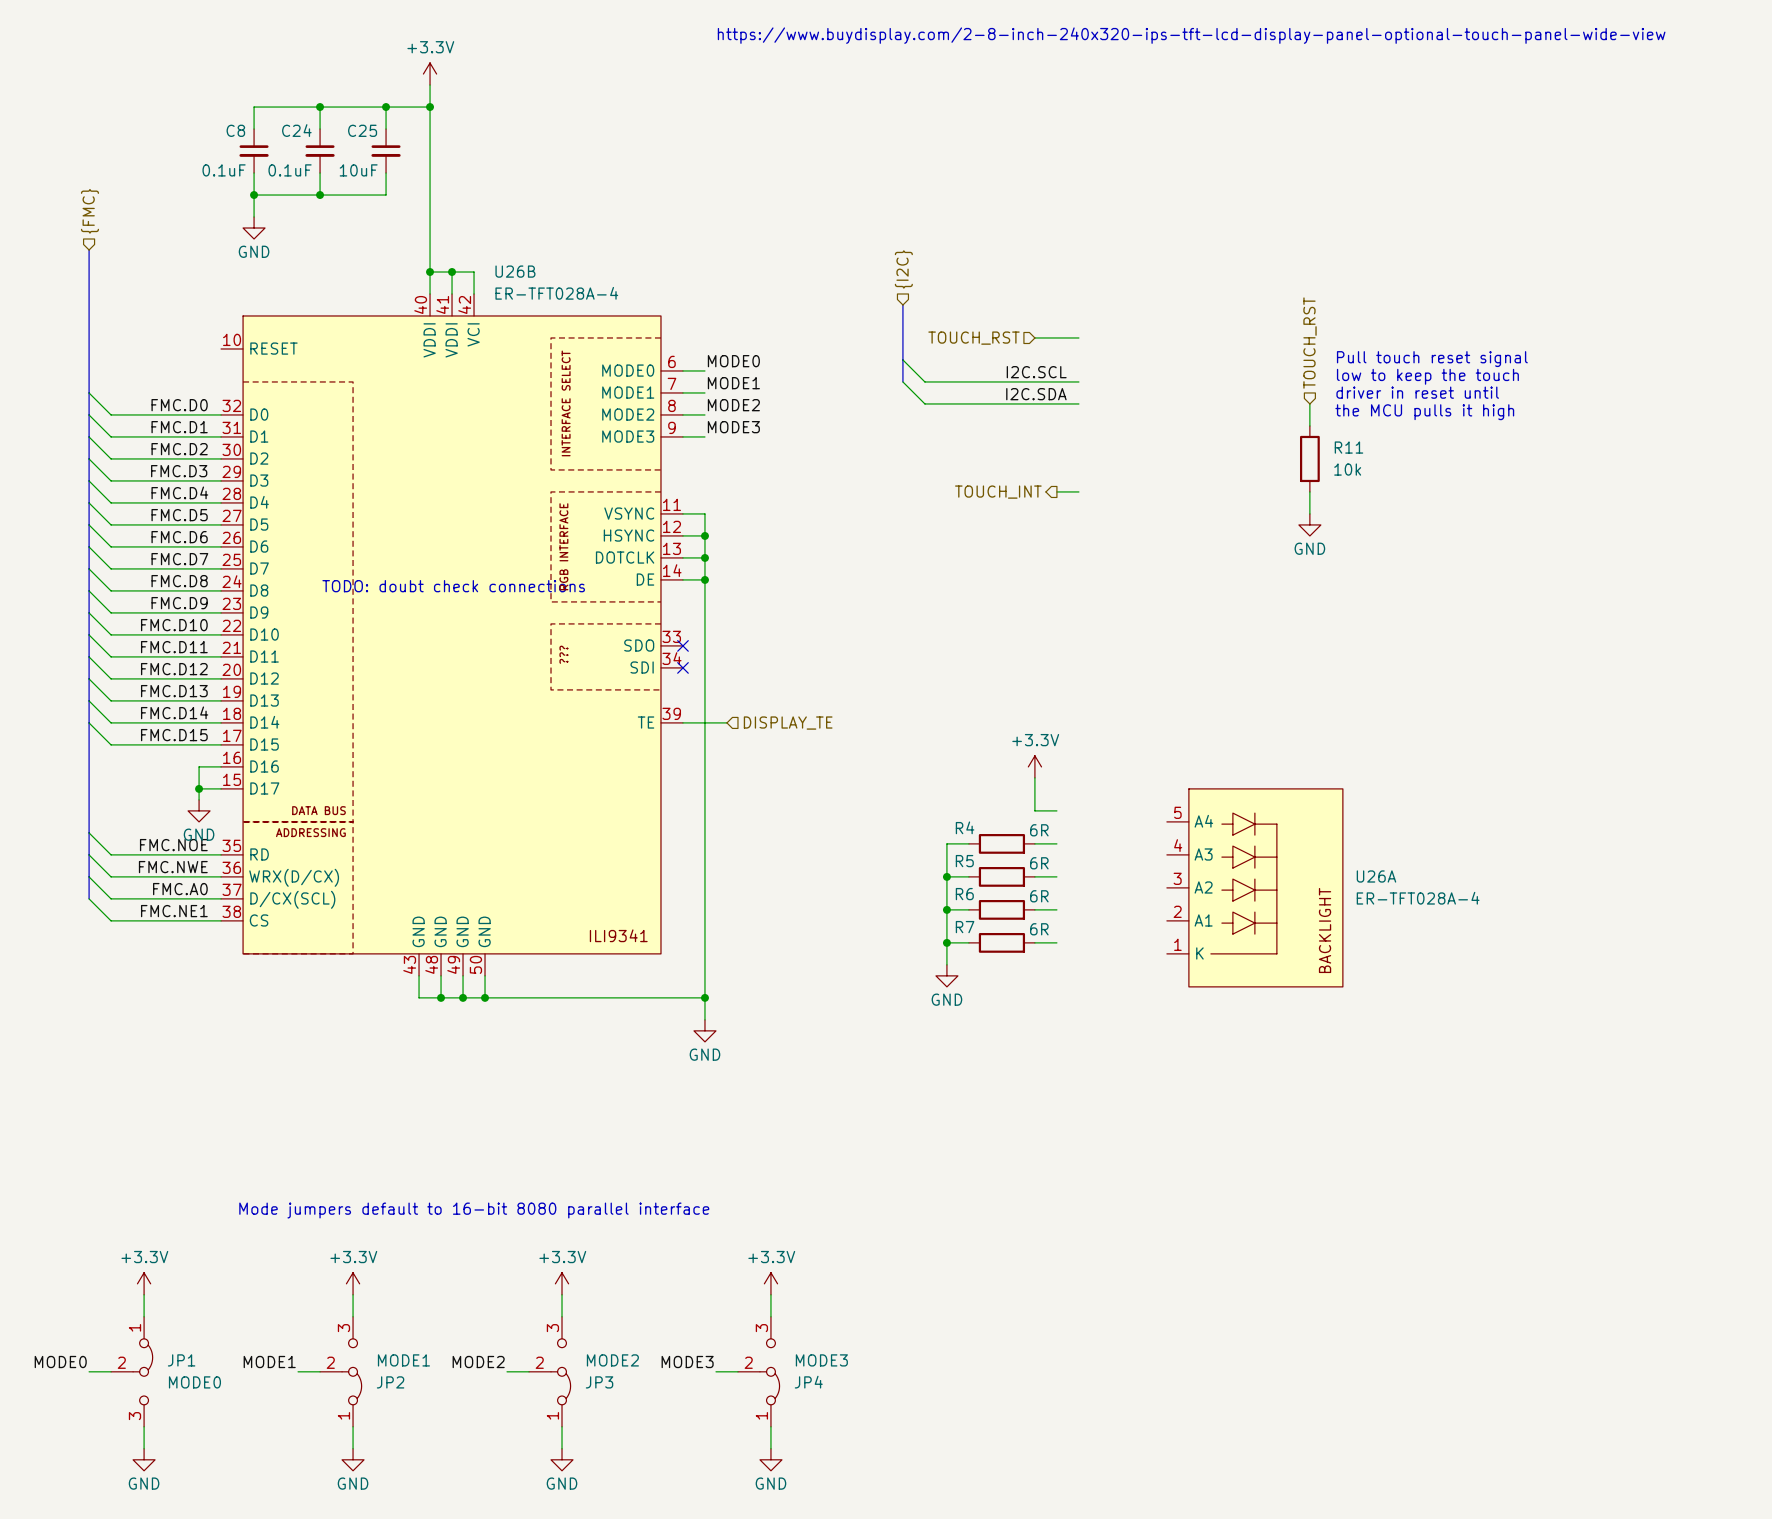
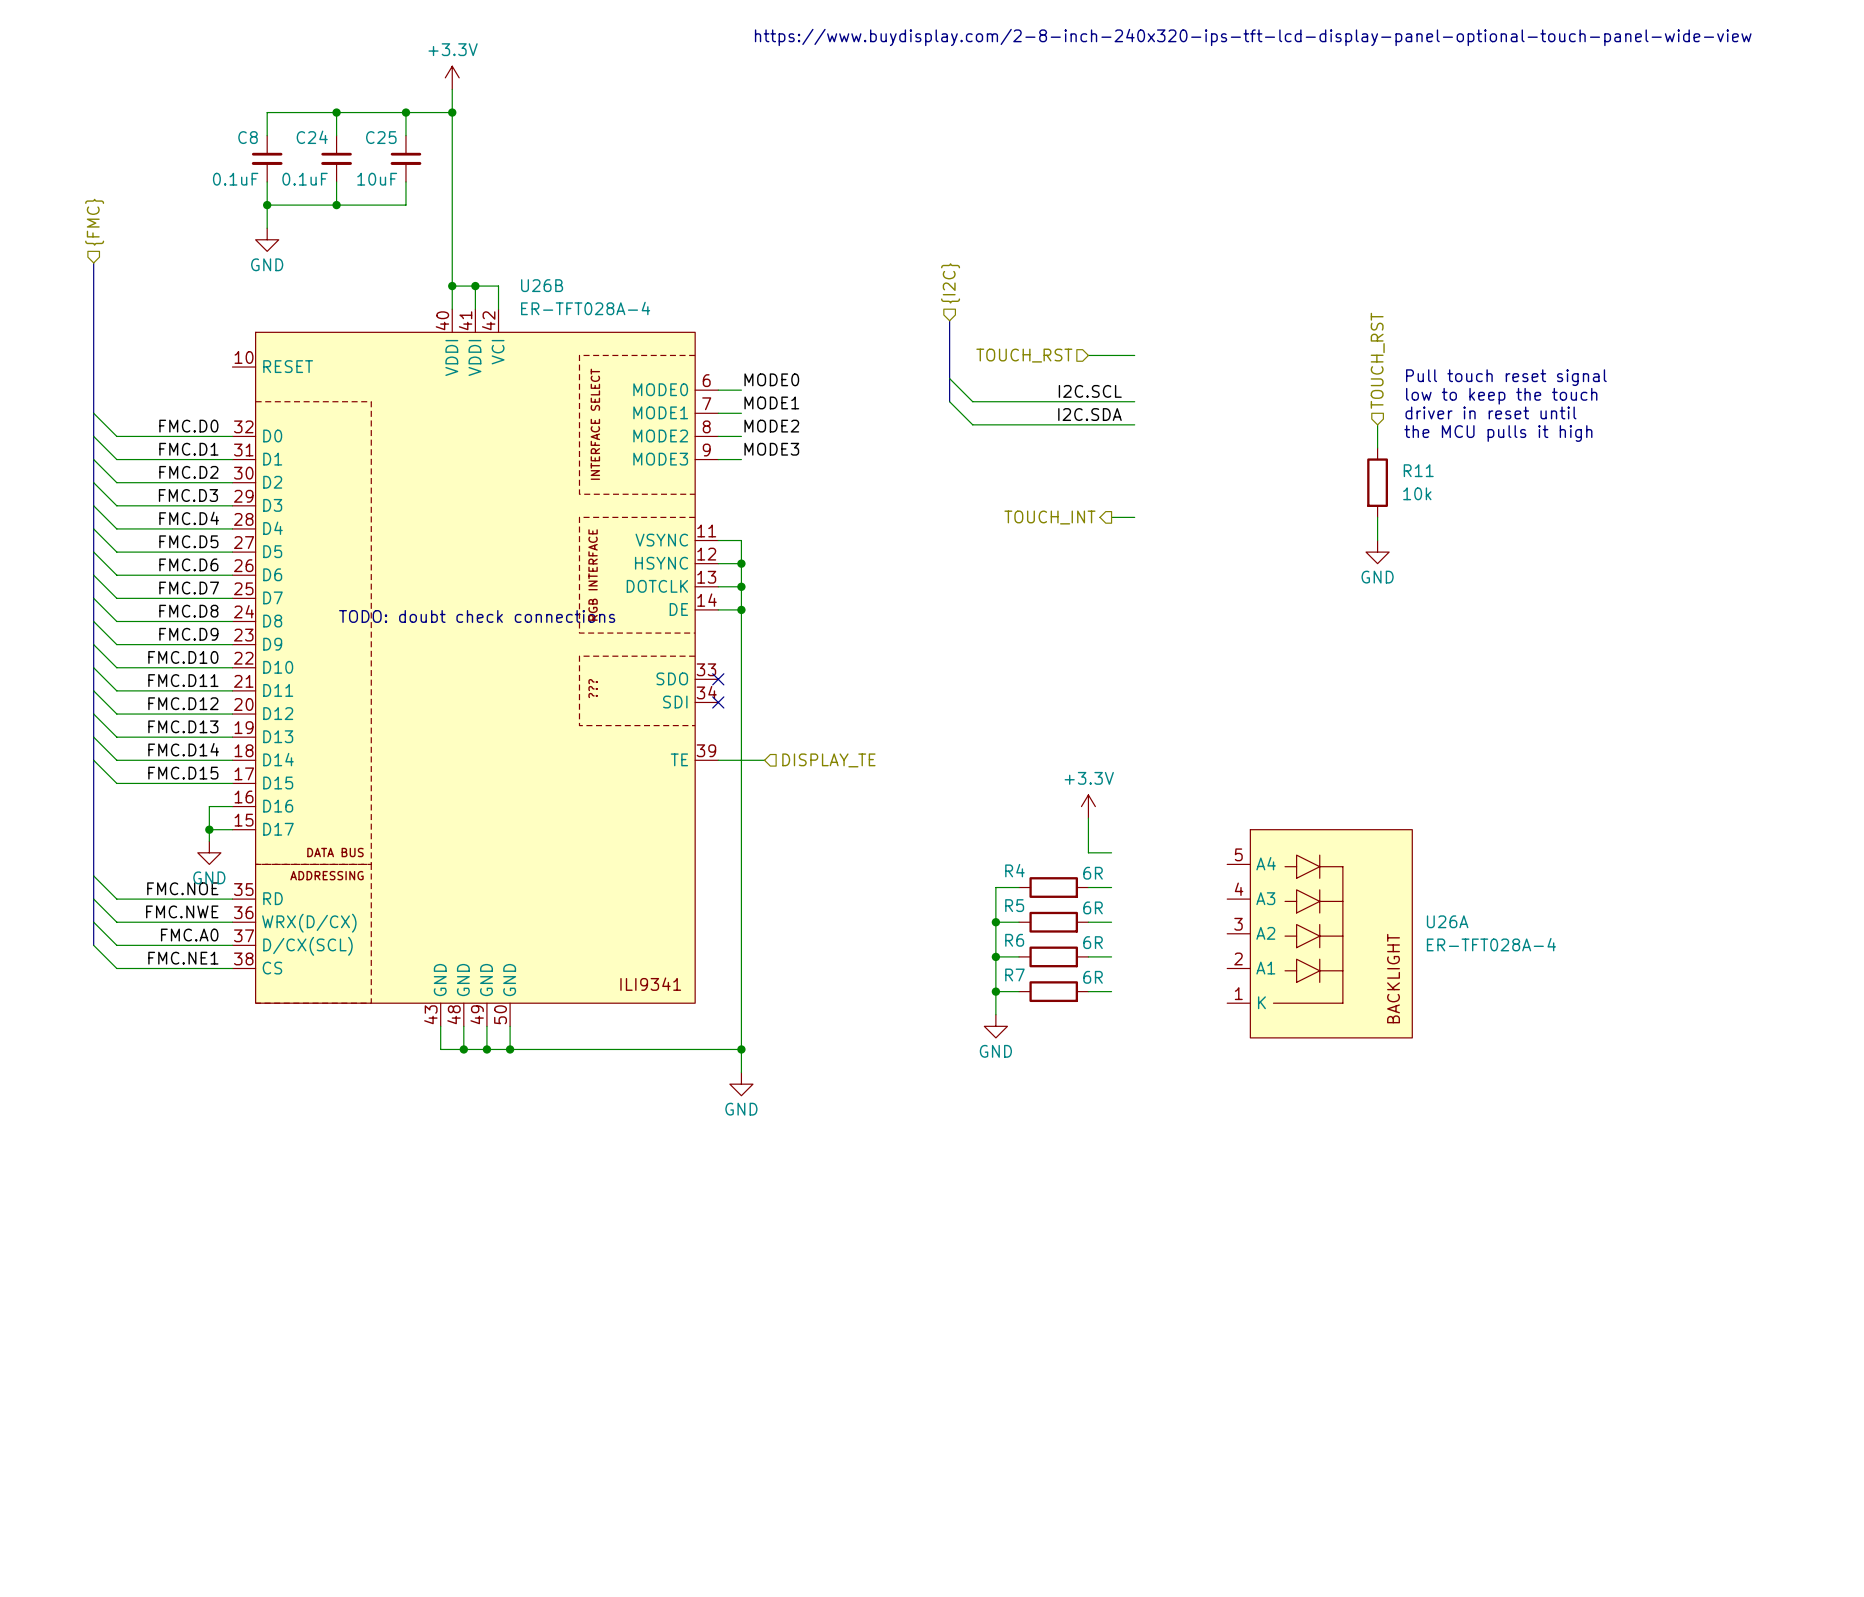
text: Mode jumpers default to 16-bit 8080 parallel interface (474, 1210) -> none
power symbol: +3.3V (144, 1283) -> none
power symbol: +3.3V (353, 1283) -> none
power symbol: +3.3V (562, 1283) -> none
power symbol: +3.3V (770, 1283) -> none
wire: (144, 1294) (144, 1316) -> none
wire: (353, 1294) (353, 1316) -> none
wire: (562, 1294) (562, 1316) -> none
wire: (770, 1294) (770, 1316) -> none
label: MODE0 (60, 1362) -> none
label: MODE1 (269, 1362) -> none
label: MODE2 (478, 1362) -> none
label: MODE3 (687, 1362) -> none
wire: (89, 1371) (111, 1371) -> none
JP1: MODE0 (131, 1371) -> none
wire: (298, 1371) (320, 1371) -> none
JP2: MODE1 (340, 1371) -> none
wire: (507, 1371) (529, 1371) -> none
JP3: MODE2 (549, 1371) -> none
wire: (715, 1371) (737, 1371) -> none
JP4: MODE3 (758, 1371) -> none
wire: (144, 1426) (144, 1448) -> none
wire: (353, 1426) (353, 1448) -> none
wire: (562, 1426) (562, 1448) -> none
wire: (770, 1426) (770, 1448) -> none
power symbol: GND (144, 1459) -> none
power symbol: GND (353, 1459) -> none
power symbol: GND (562, 1459) -> none
power symbol: GND (770, 1459) -> none

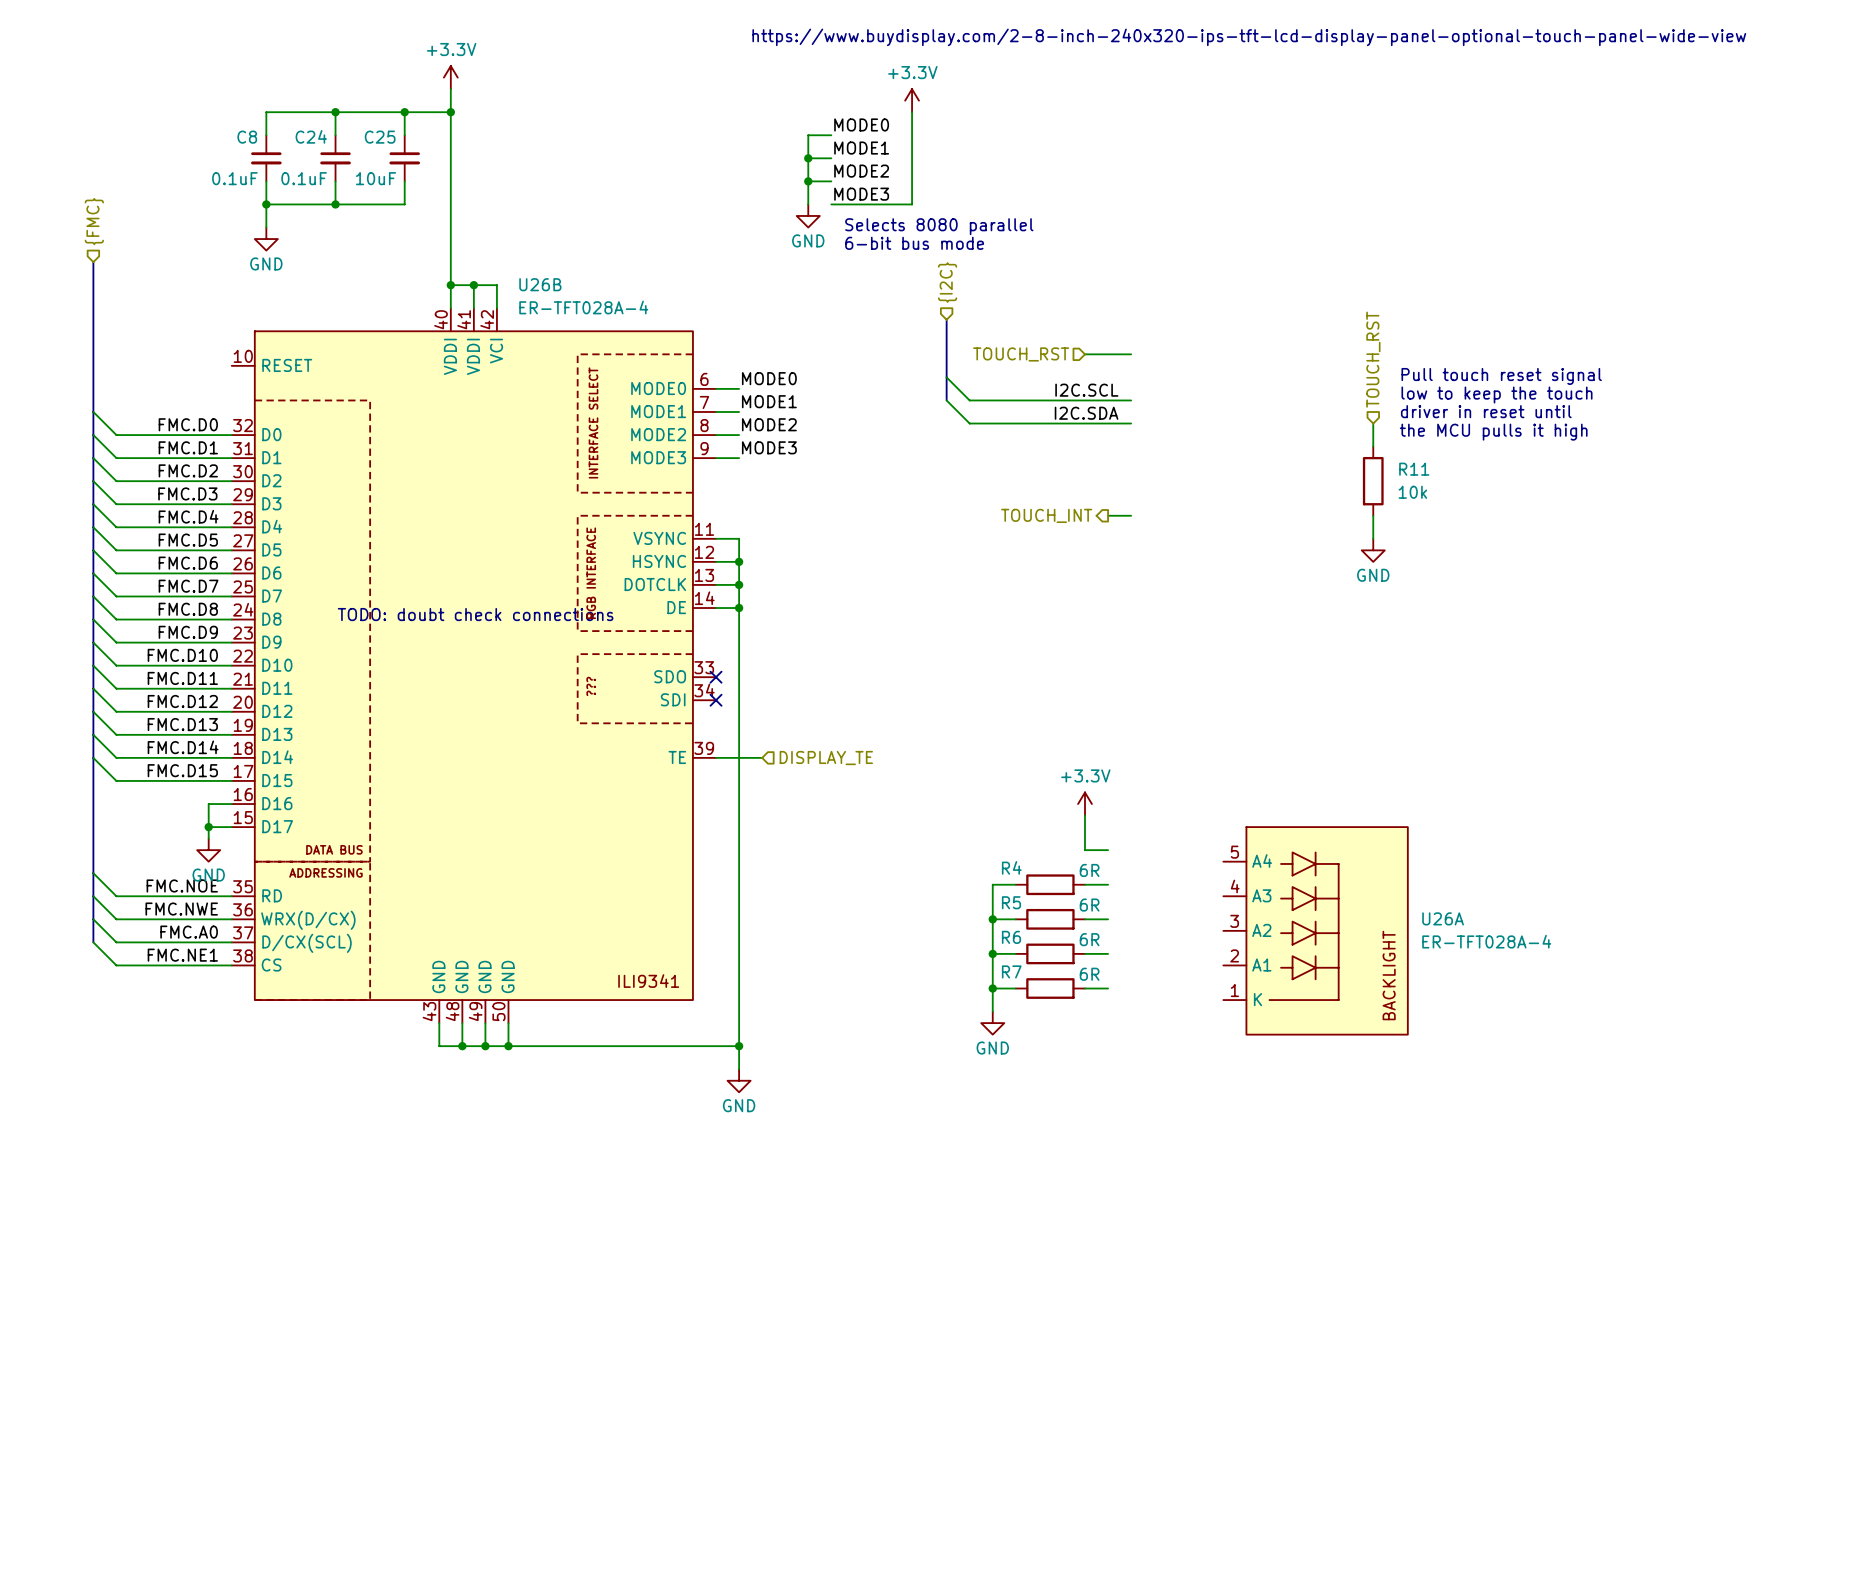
power symbol: none -> +3.3V (912, 100)
wire: none -> (912, 112) (912, 204) (831, 204)
label: none -> MODE0 (861, 124)
wire: none -> (831, 135) (808, 135) (808, 204)
label: none -> MODE1 (861, 148)
wire: none -> (808, 158) (831, 158)
junction: none -> (808, 158)
label: none -> MODE2 (861, 171)
wire: none -> (808, 181) (831, 181)
junction: none -> (808, 181)
label: none -> MODE3 (861, 194)
power symbol: none -> GND (808, 215)
text: none -> Selects 8080 parallel (939, 226)
text: none -> 6-bit bus mode (914, 243)

